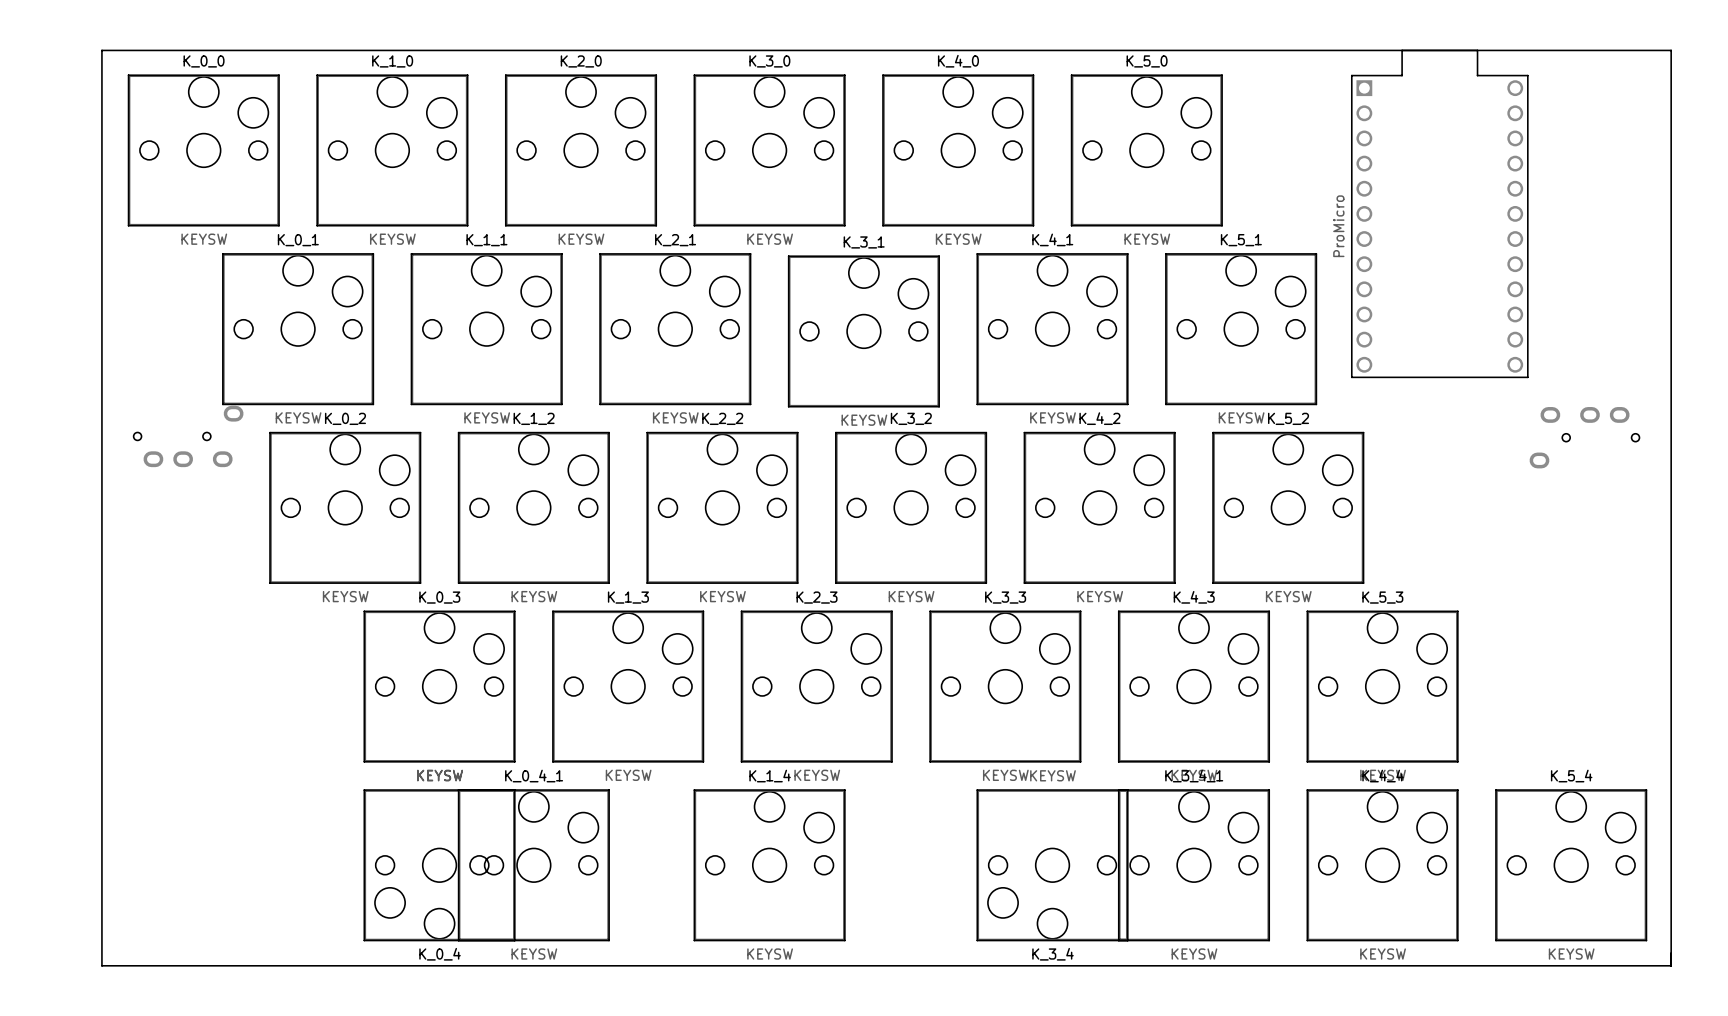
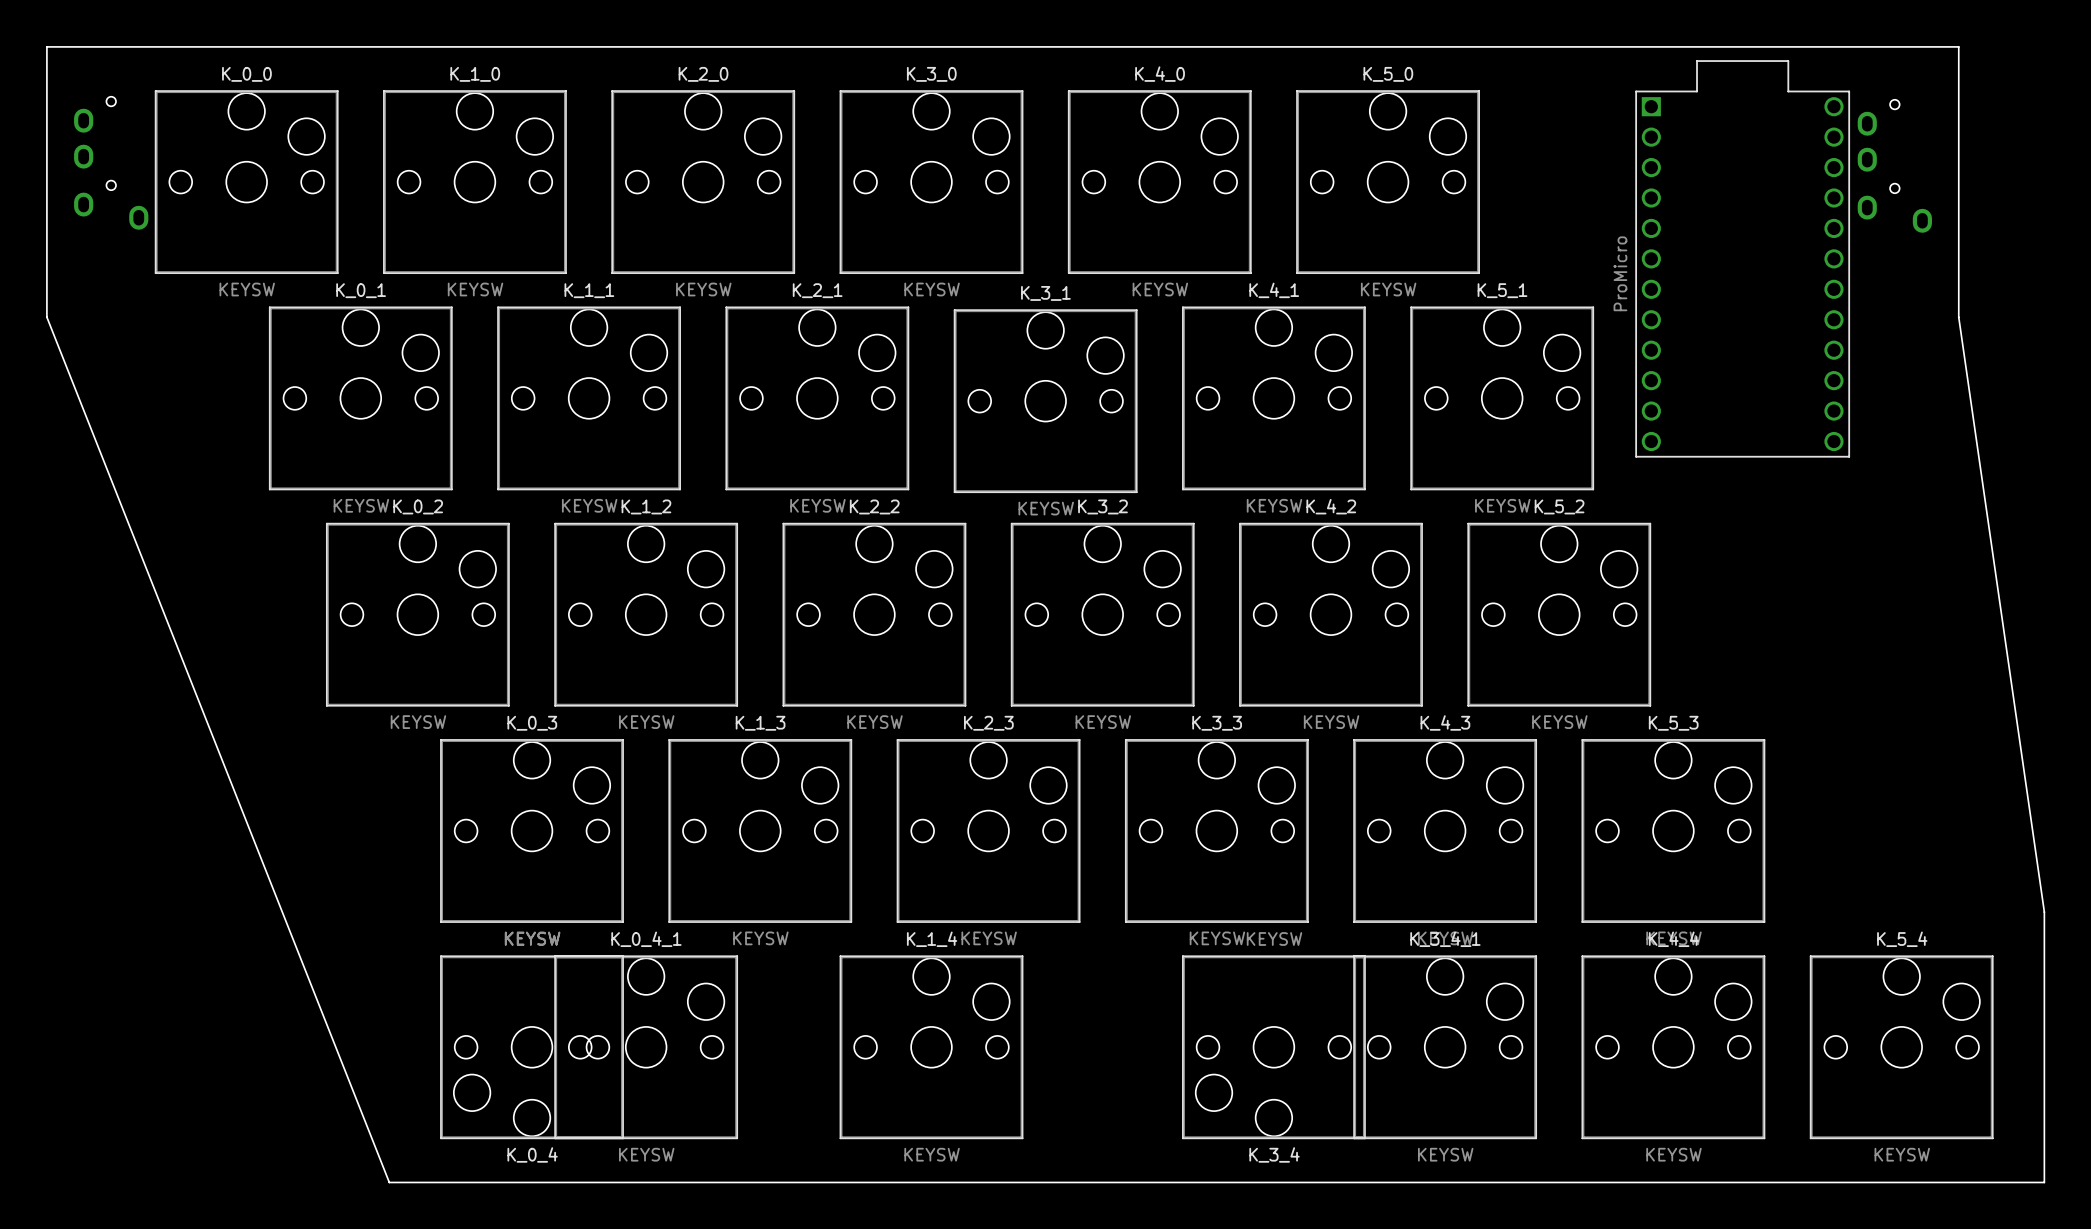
board edge: (101, 50) (1671, 50) (1671, 965) (101, 965) (101, 50) -> (46, 46) (46, 317) (389, 1182) (2044, 1182) (2044, 912) (1958, 317) (1958, 46) (46, 46)
part: none -> (111, 163)
part: none -> (1894, 166)
part: (188, 436) -> none
part: (1584, 437) -> none

